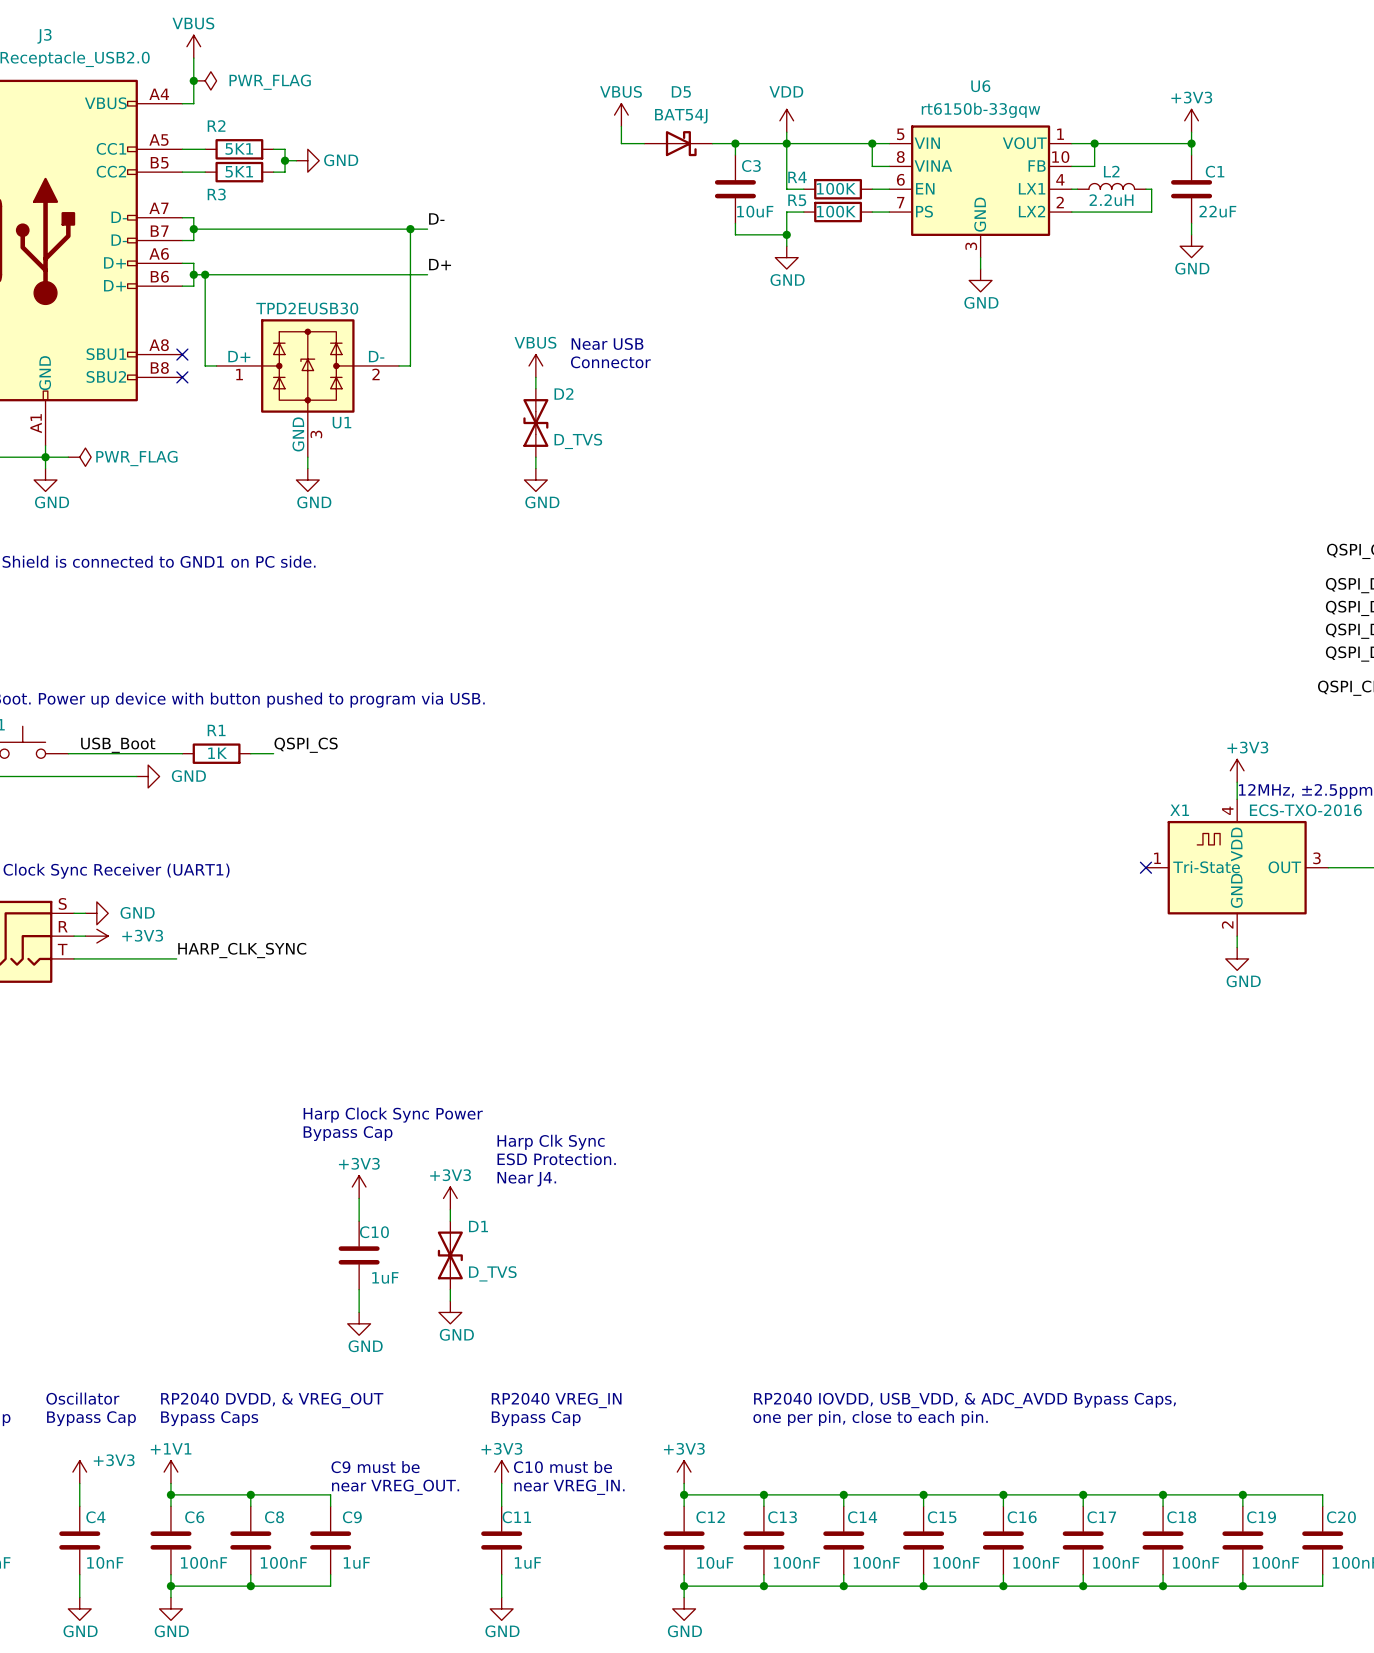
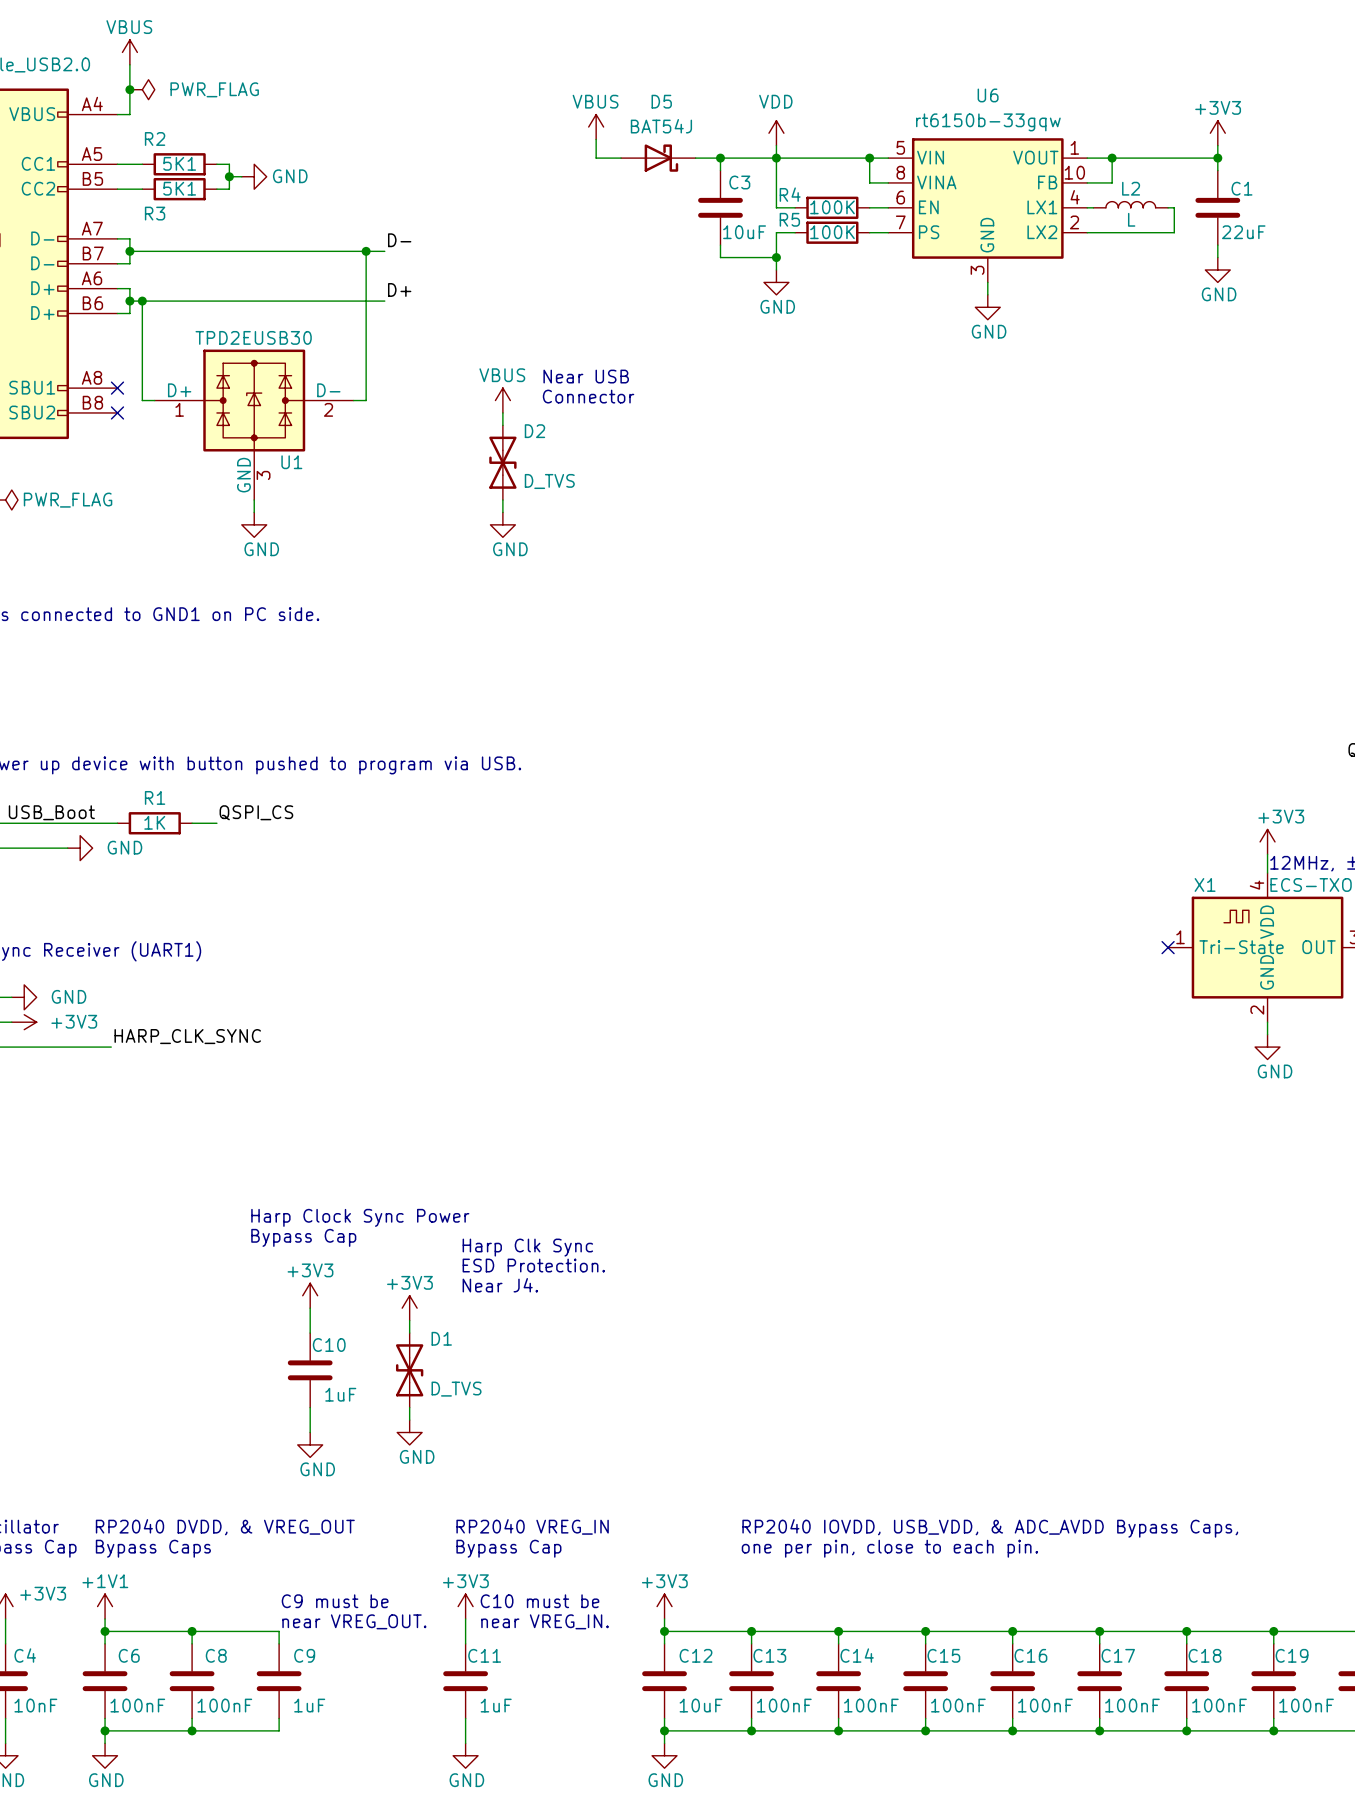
L2 value: 2.2uH (1111, 200) -> L (1131, 219)

